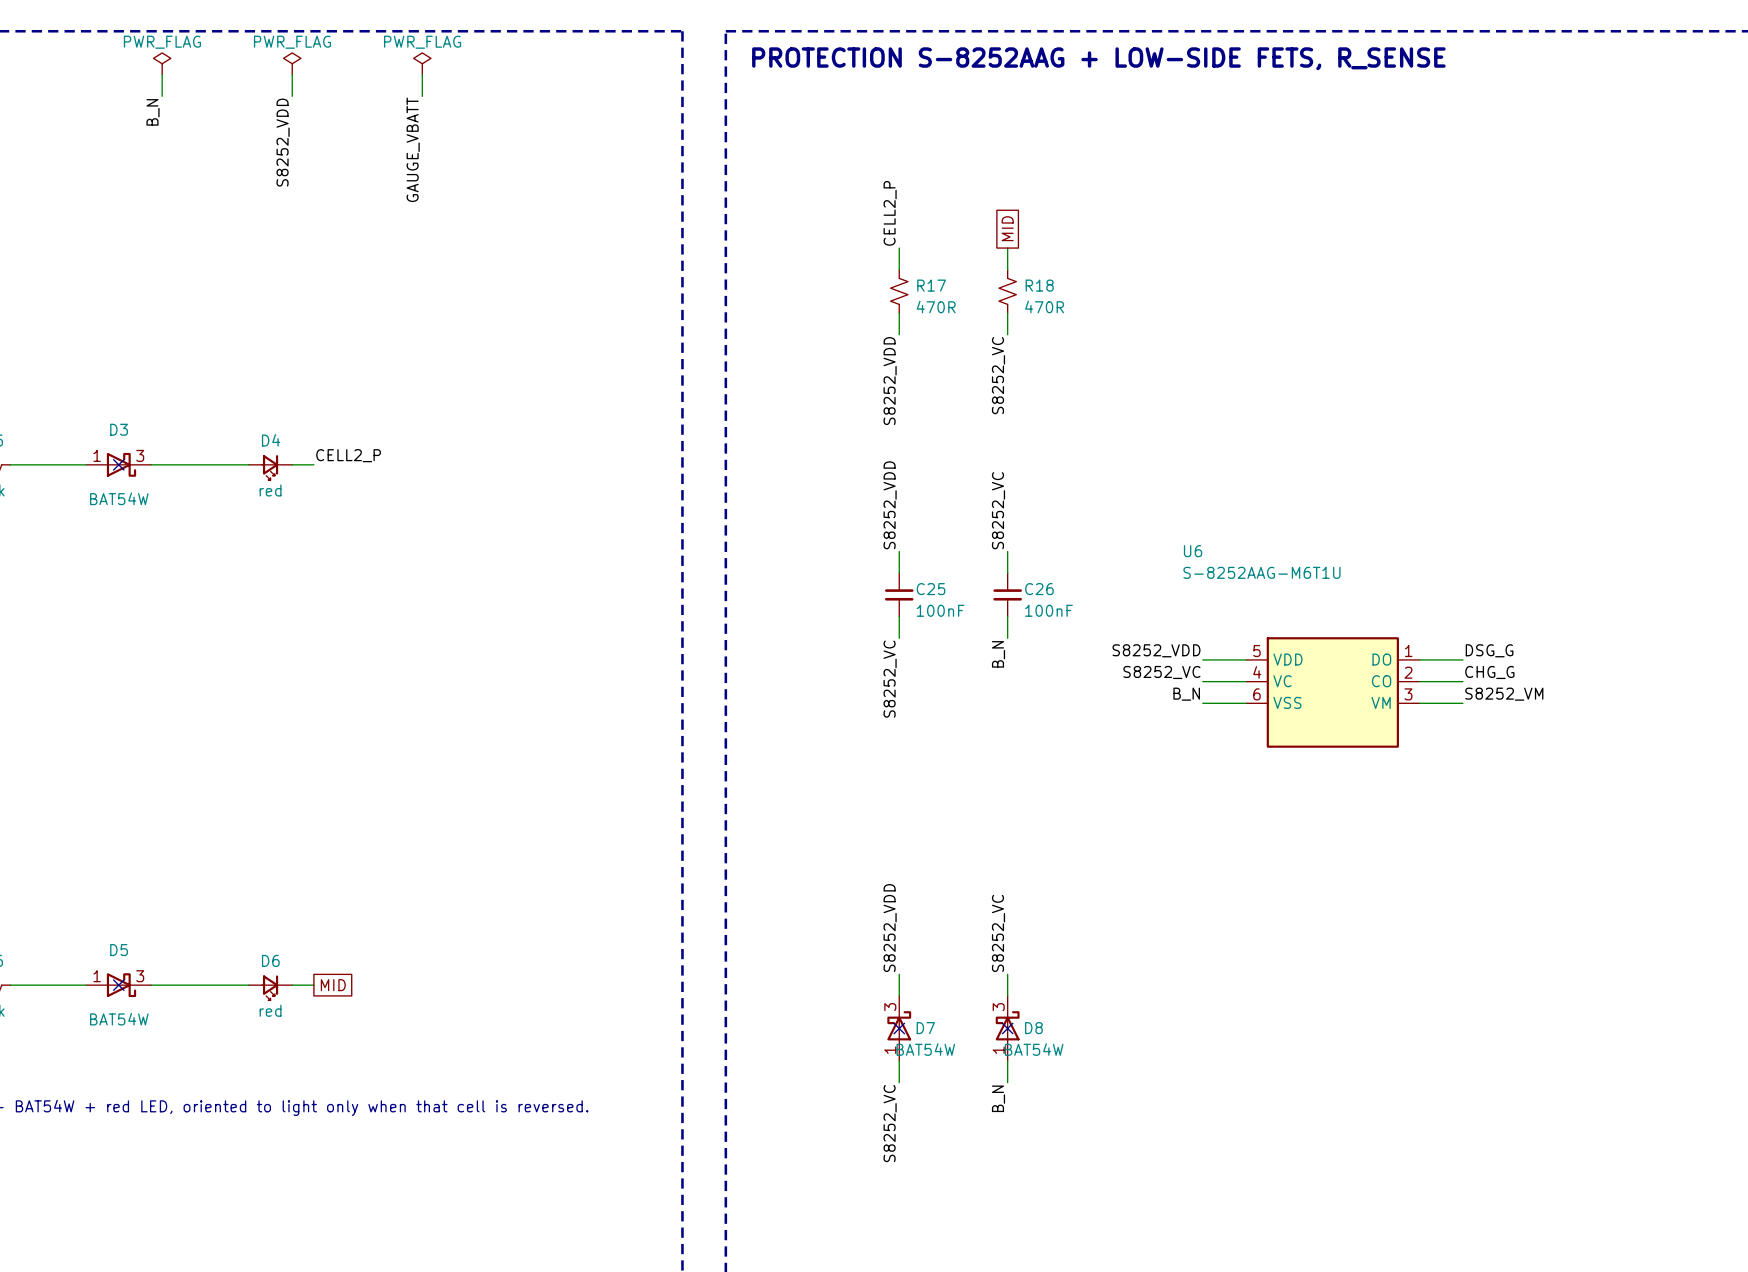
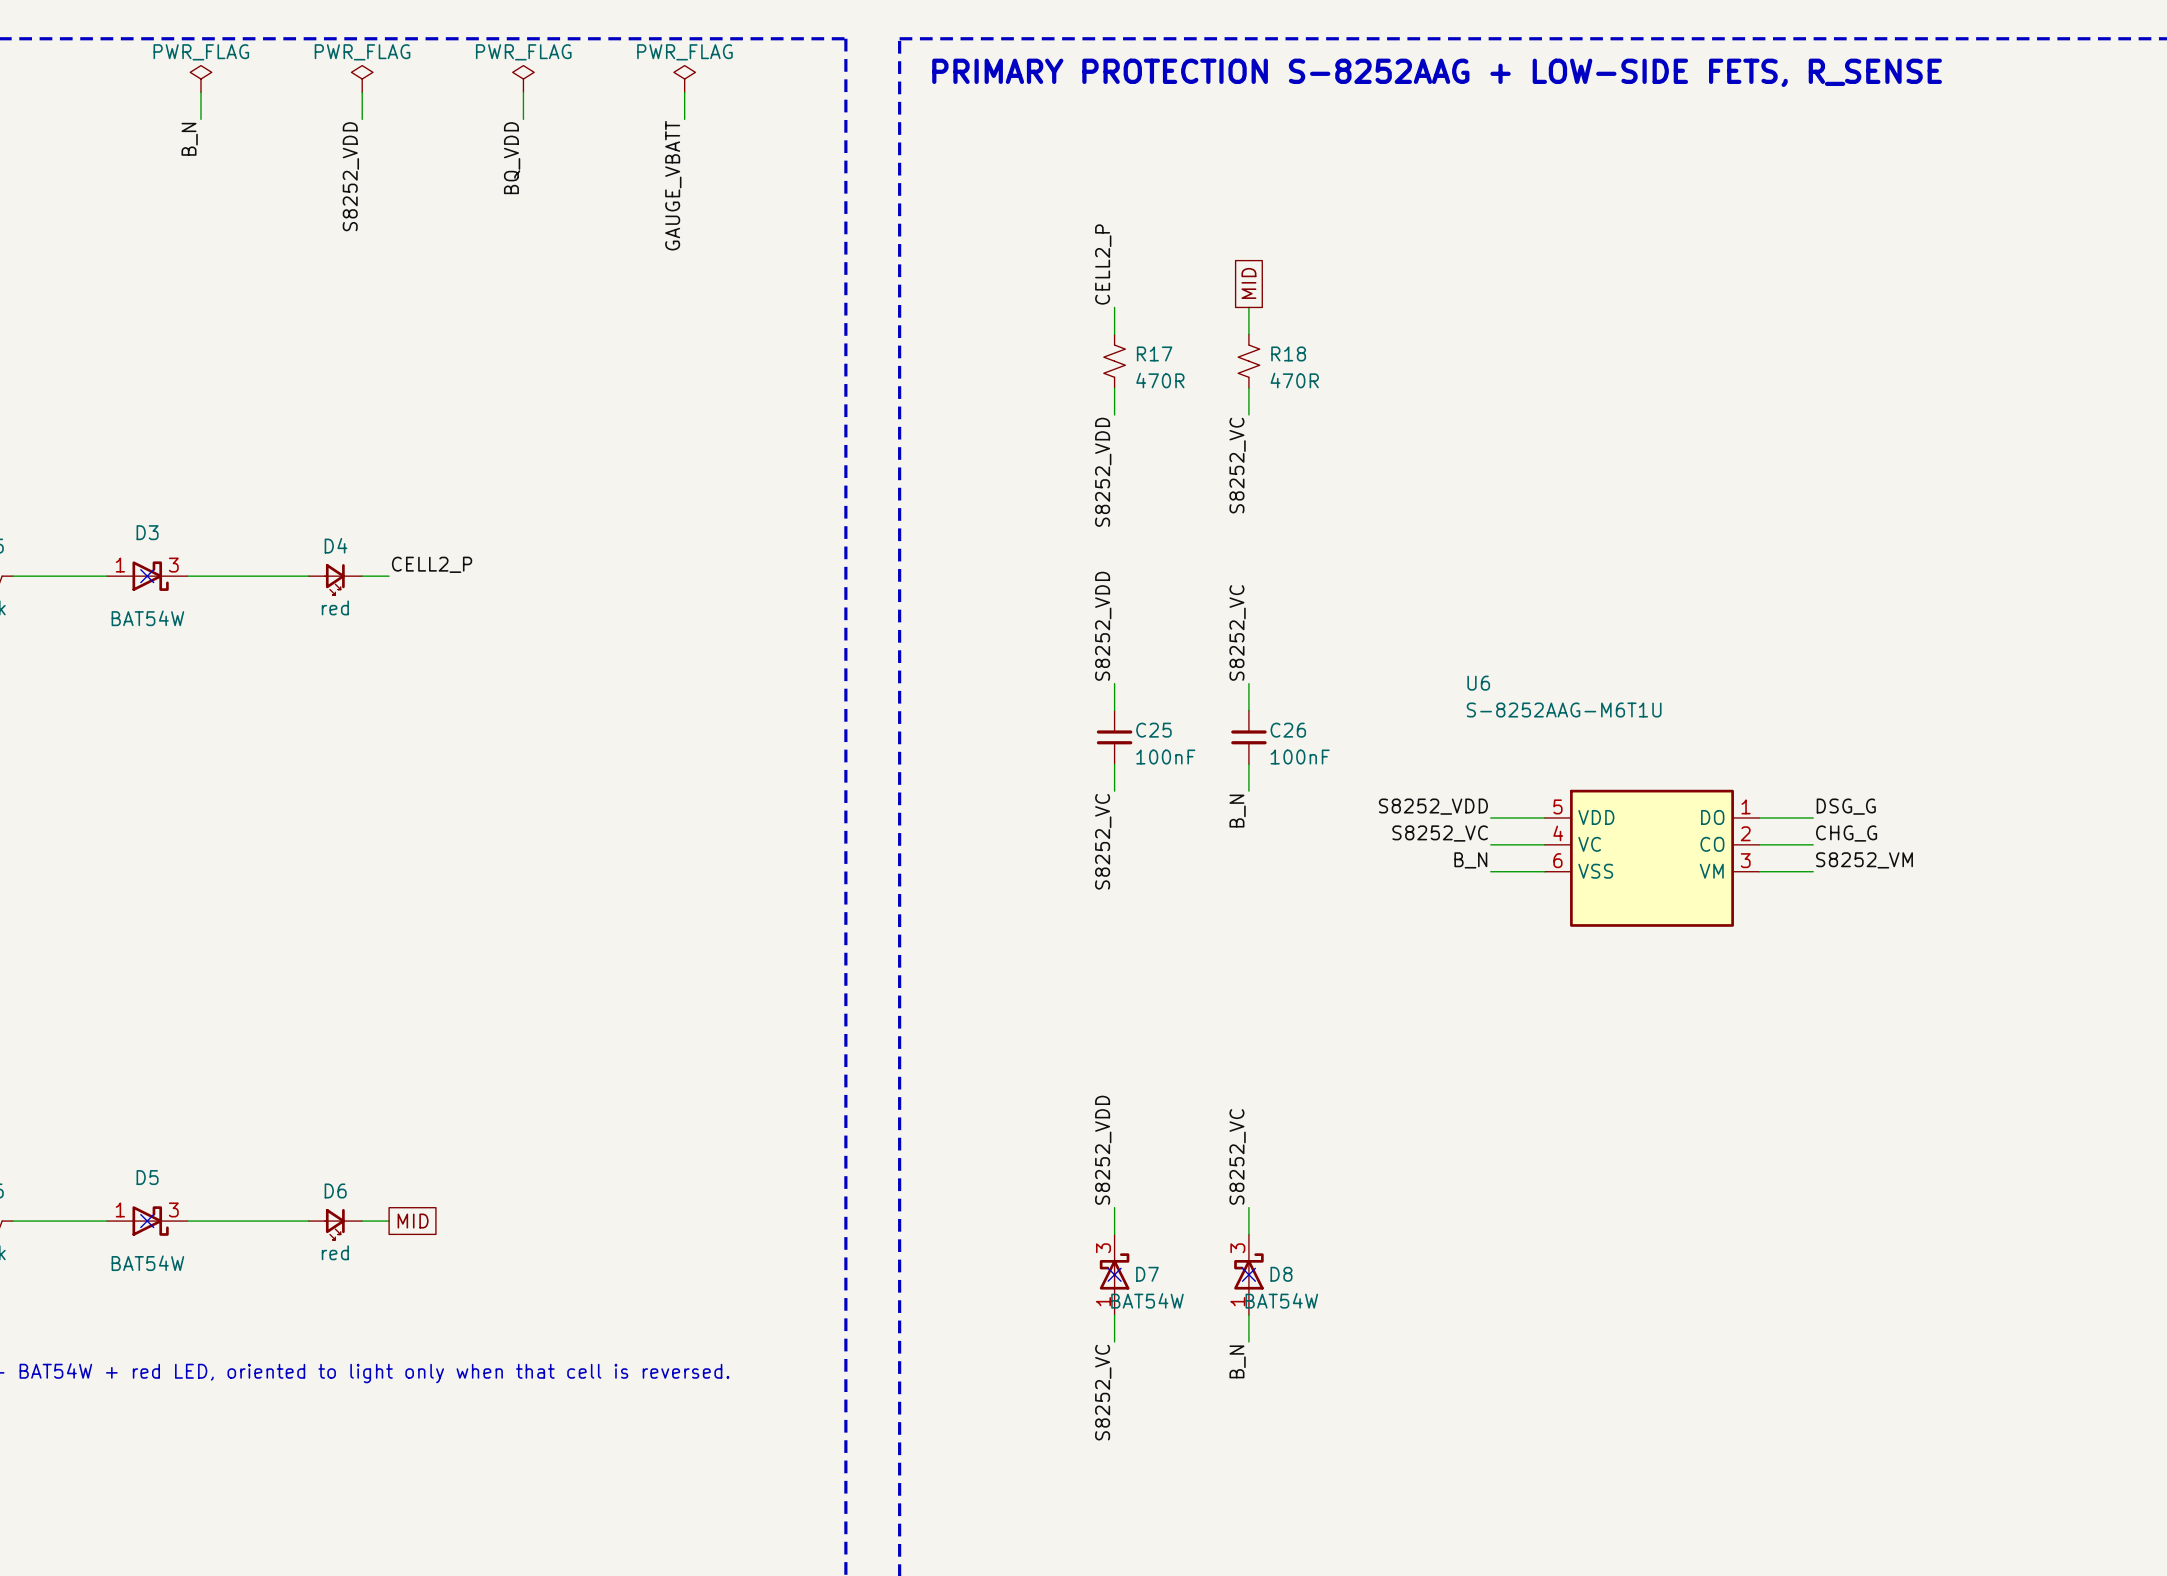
text: PROTECTION S-8252AAG + LOW-SIDE FETS, R_SENSE (1098, 58) -> PRIMARY PROTECTION S-8252AAG + LOW-SIDE FETS, R_SENSE (1437, 72)
power symbol: none -> PWR_FLAG (684, 79)
wire: none -> (684, 92) (684, 119)
label: GAUGE_VBATT (413, 149) -> BQ_VDD (512, 158)
label: none -> GAUGE_VBATT (673, 185)

